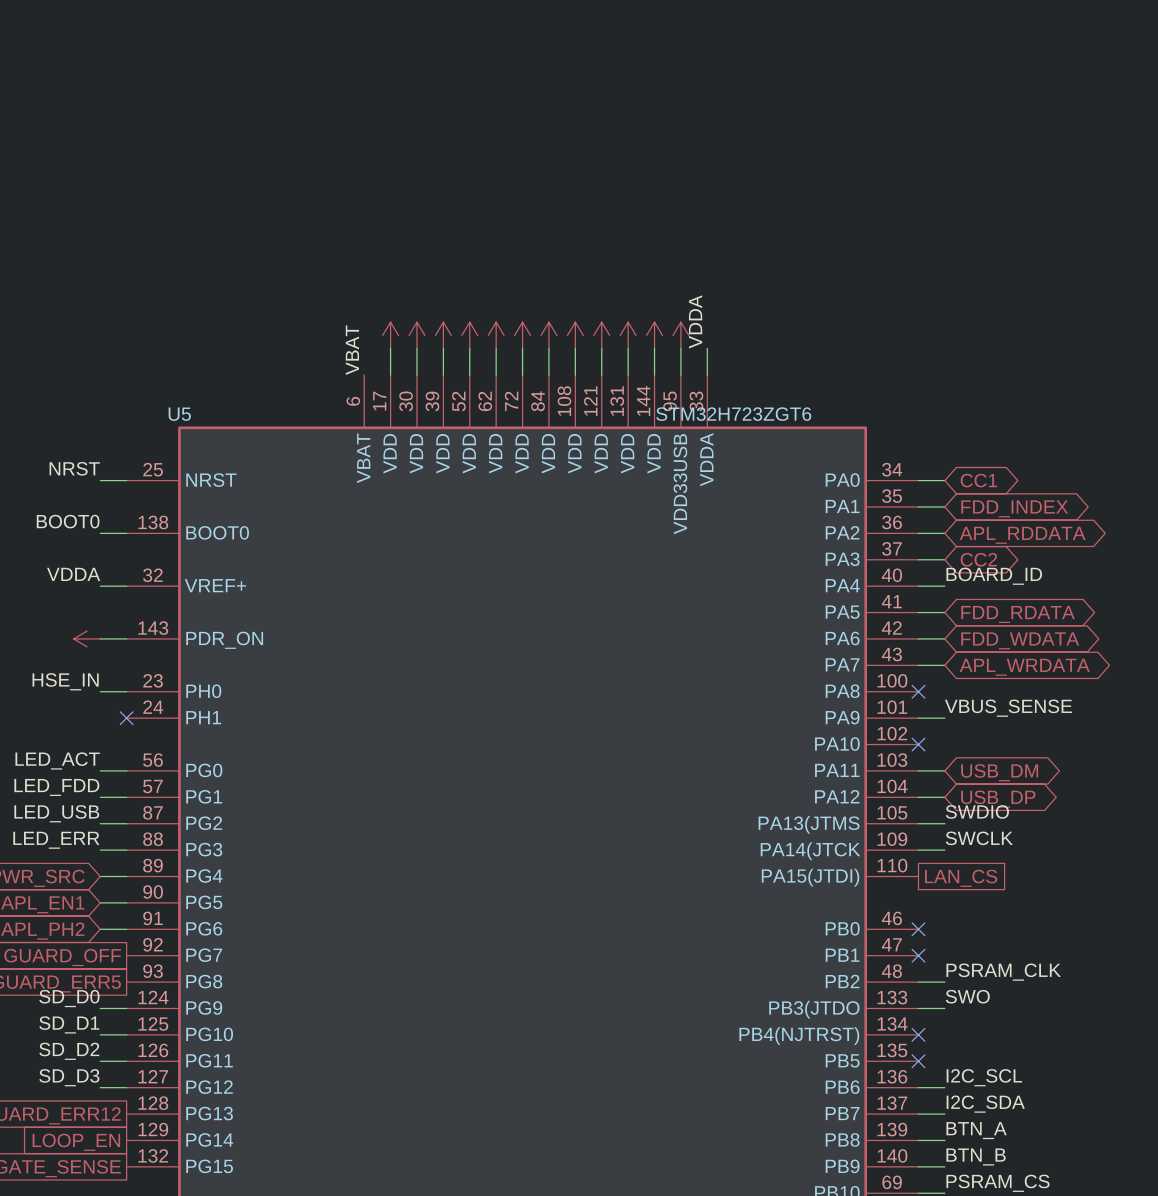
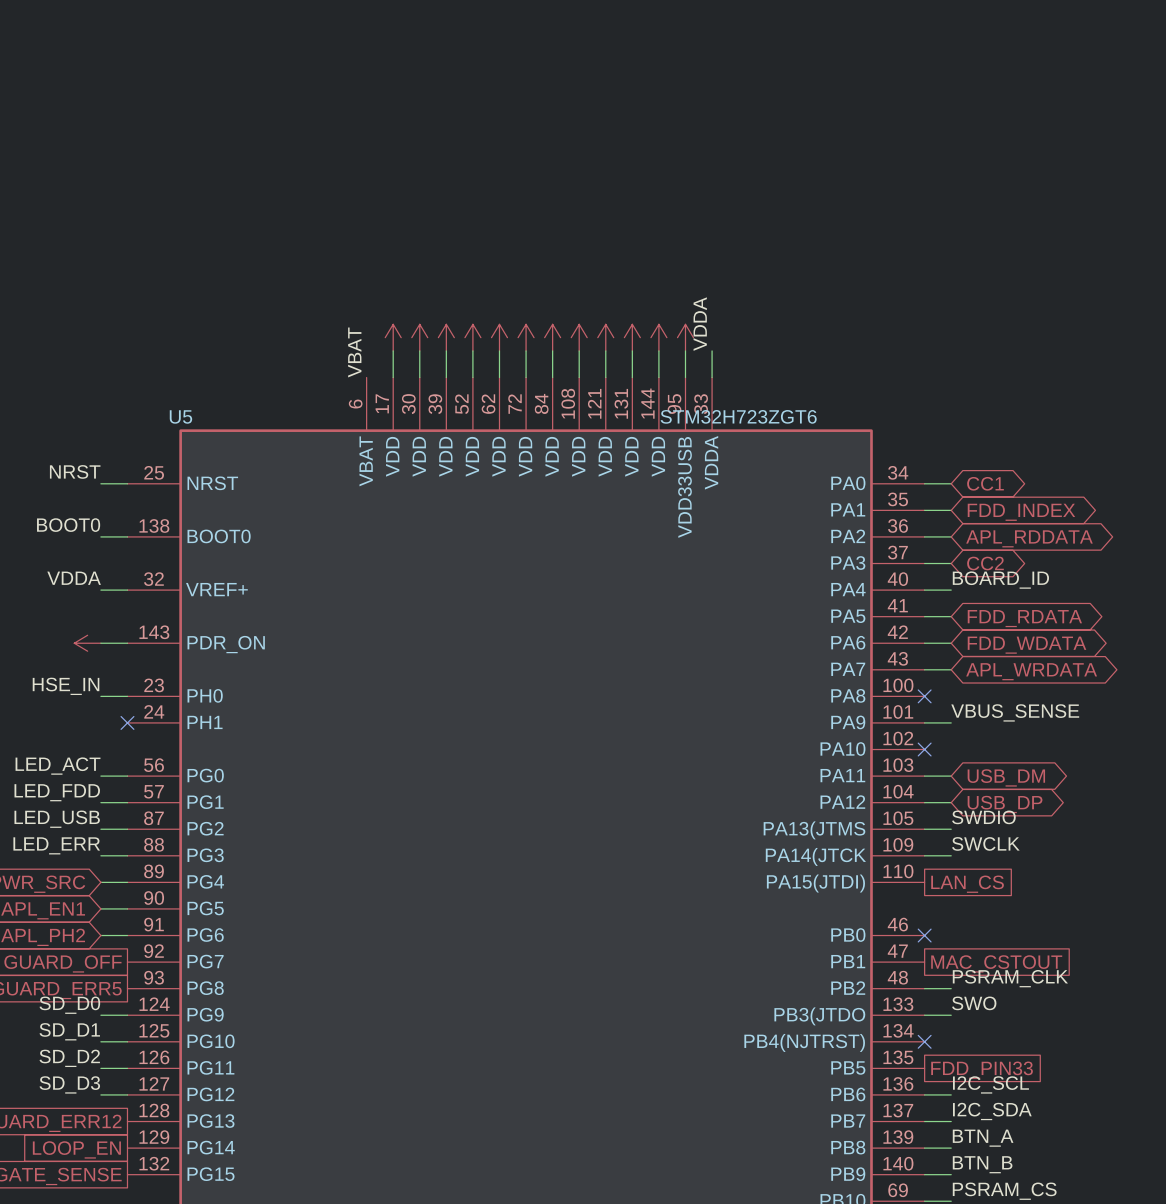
no-connect mark: (918, 955) -> none
global label: none -> MAC_CSTOUT (996, 963)
no-connect mark: (918, 1061) -> none
global label: none -> FDD_PIN33 (982, 1070)

